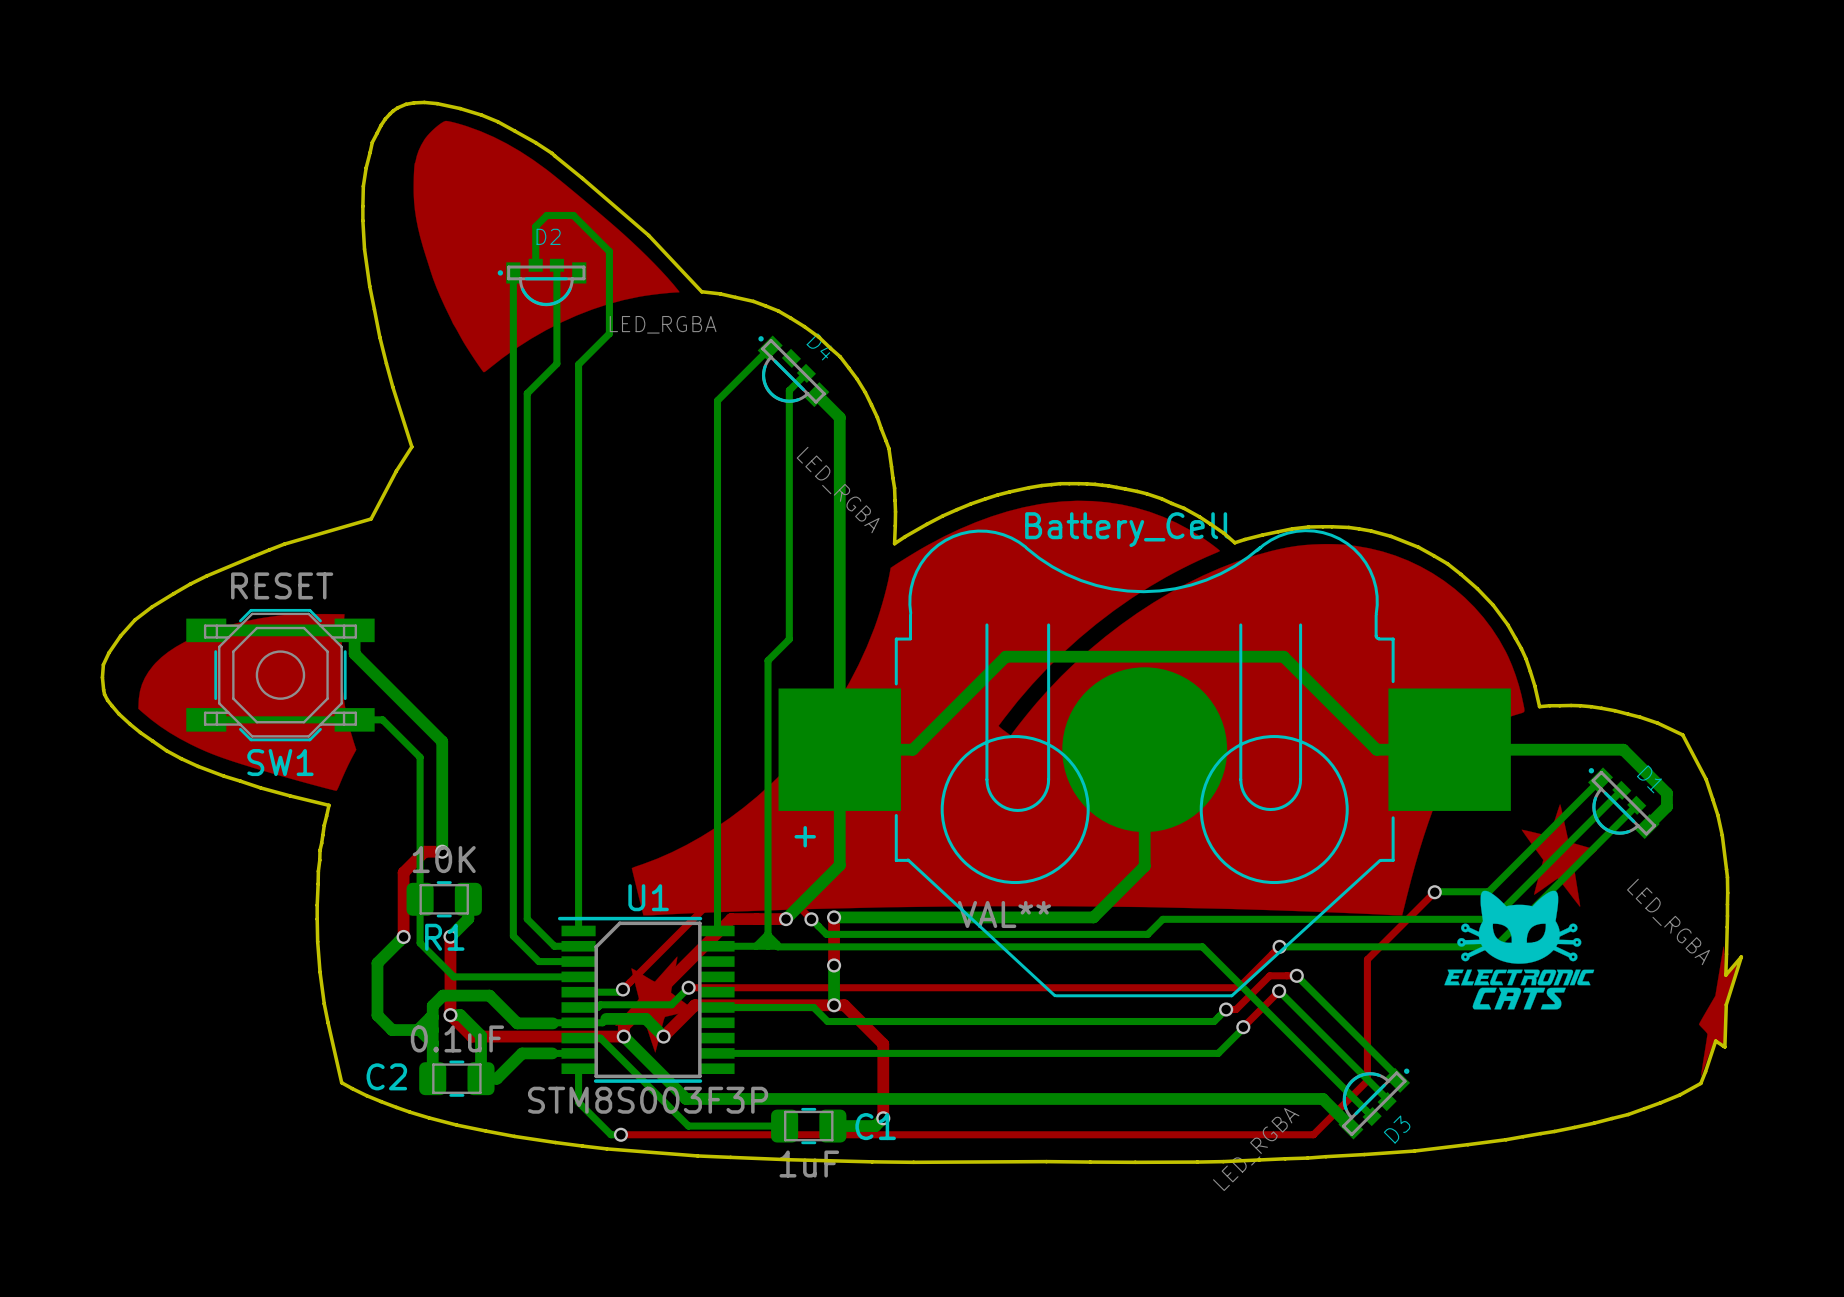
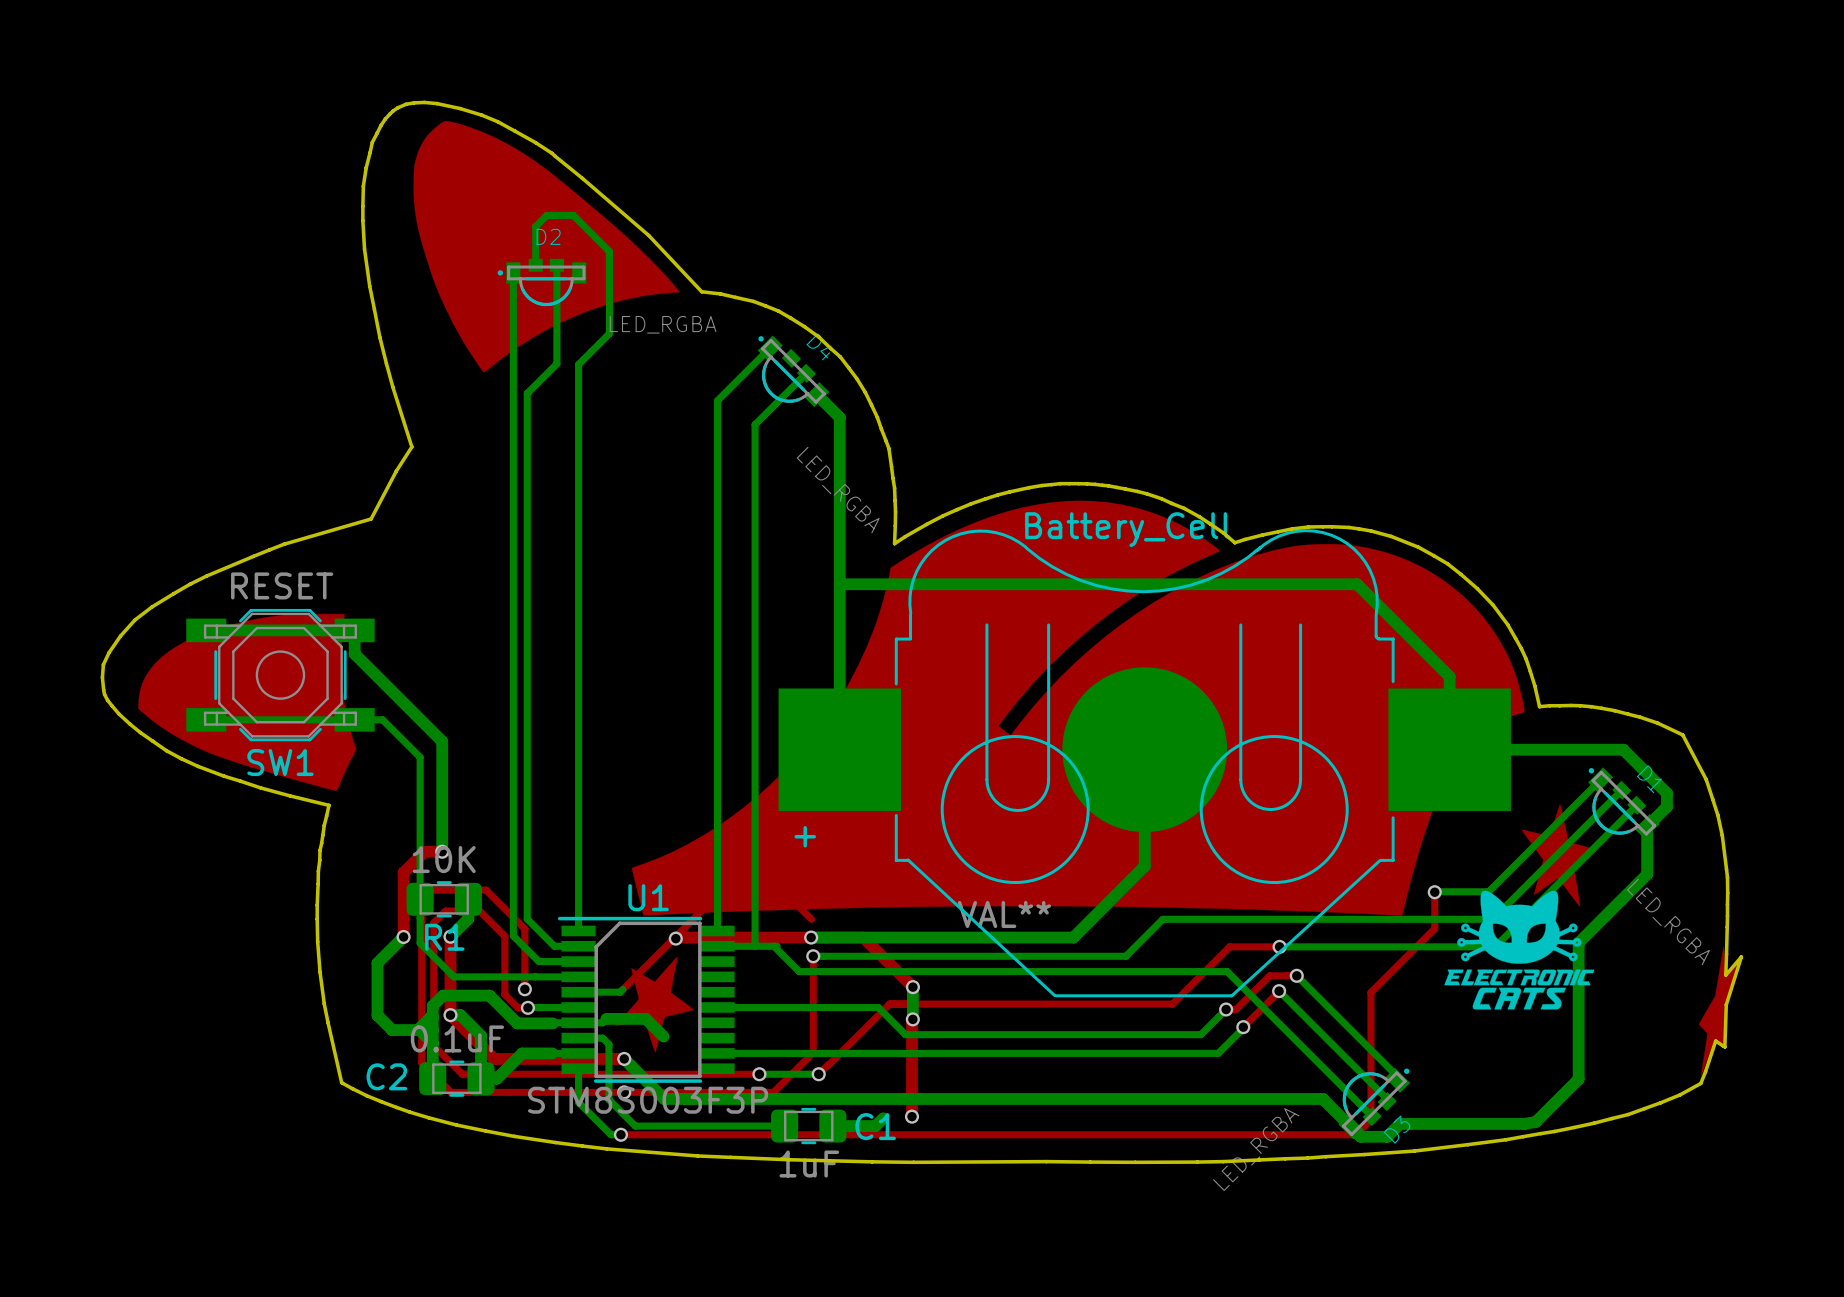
bottom track: (789, 390) (789, 639) (768, 660) (768, 946) -> (789, 390) (755, 424) (755, 946)
bottom track: (1449, 749) (1376, 749) (1283, 656) (1005, 656) (912, 749) (839, 749) (839, 865) (786, 919) -> (1449, 749) (1449, 676) (1357, 584) (839, 584)
bottom track: none -> (1647, 826) (1647, 874) (1578, 942) (1578, 1079) (1535, 1121) (1524, 1123) (1399, 1123) (1387, 1136) (1360, 1136) (1350, 1127)
top track: (1434, 892) (1367, 959) (1367, 1080) (1313, 1134) -> (1434, 892) (1434, 928) (1370, 992) (1370, 1119) (1356, 1134) (1313, 1134)
top track: (834, 917) (834, 965) -> none
via: (834, 917) -> none
bottom track: (1093, 917) (834, 917) -> (1093, 917) (1073, 937) (811, 937)
top track: (786, 919) (731, 919) (623, 1026) (623, 1036) (471, 1036) -> (624, 1058) (494, 1058) (471, 1036)
via: (786, 919) -> none
bottom track: (811, 919) (826, 934) (1147, 934) -> (813, 956) (1125, 956) (1147, 934)
via: (811, 919) -> none
via: none -> (811, 937)
top track: none -> (675, 938) (863, 937) (912, 987)
via: none -> (675, 938)
bottom track: (756, 946) (768, 935) (777, 946) (1202, 946) (1227, 971) -> (773, 946) (799, 971) (1227, 971)
top track: (1279, 946) (1238, 987) (688, 987) -> (1279, 946) (1229, 946) (1172, 1004) (889, 1004) (818, 1074)
top track: none -> (813, 956) (813, 1052) (773, 1092) (451, 1092) (421, 1062) (421, 900) (432, 890) (486, 890) (524, 928) (524, 989)
via: none -> (813, 956)
bottom track: (834, 965) (834, 1005) -> none
via: (834, 965) -> none
bottom track: (688, 987) (671, 1004) (600, 1004) (597, 1007) (578, 1007) -> (527, 1007) (578, 1007)
via: (688, 987) -> none
bottom track: none -> (912, 987) (912, 1019)
via: none -> (912, 987)
via: none -> (524, 989)
via: (622, 989) -> none
via: (834, 1005) -> none
top track: none -> (527, 1007) (517, 1007) (504, 994) (504, 936) (479, 911) (445, 911) (433, 922) (433, 1045) (462, 1074) (759, 1074)
via: none -> (527, 1007)
bottom track: (813, 1007) (827, 1021) (1214, 1021) -> (813, 1007) (878, 1007) (905, 1034) (1200, 1034) (1214, 1021)
top track: none -> (912, 1019) (912, 1116)
via: none -> (912, 1019)
bottom track: (623, 1036) (686, 1098) -> (624, 1058) (664, 1098) (686, 1098)
via position: (623, 1036) -> (624, 1058)
top track: (663, 1036) (694, 1005) (844, 1005) (883, 1044) (883, 1118) -> none
via: (663, 1036) -> none
bottom track: (600, 1038) (688, 1126) -> (600, 1038) (608, 1044) (608, 1099) (635, 1126) (688, 1126)
via: none -> (759, 1074)
bottom track: none -> (818, 1074) (759, 1074)
via: none -> (818, 1074)
via: none -> (624, 1092)
via position: (883, 1118) -> (912, 1116)

